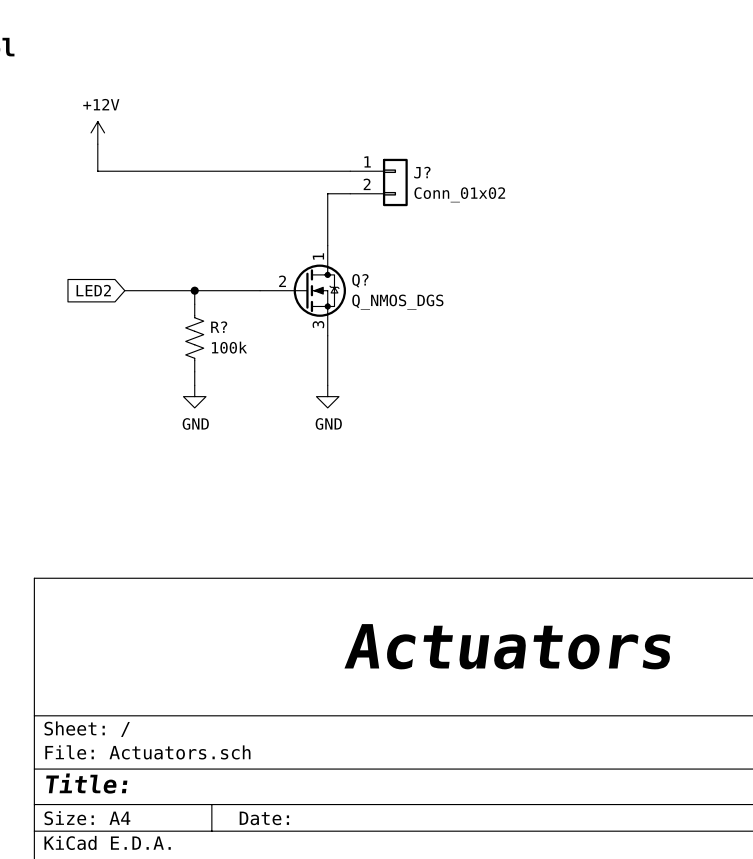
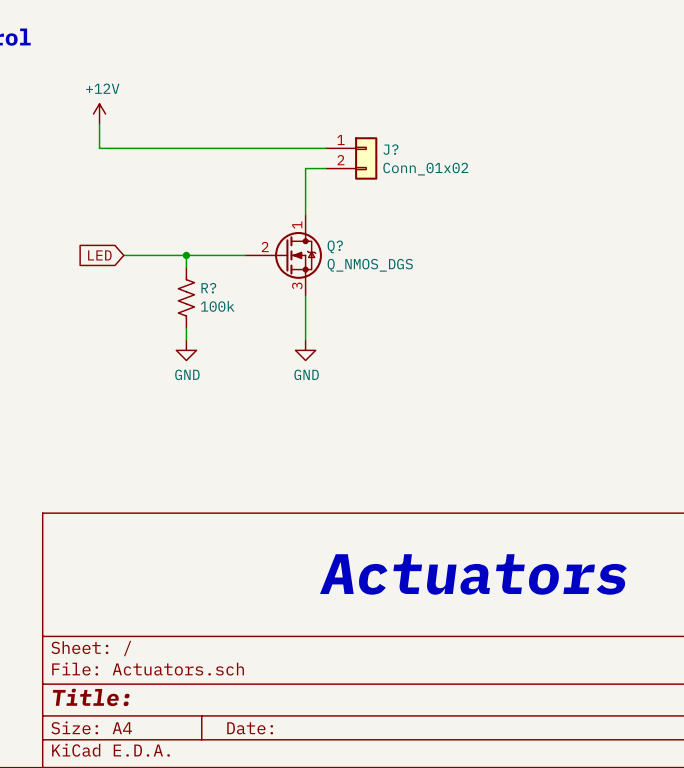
global label: LED2 (93, 290) -> LED (99, 255)

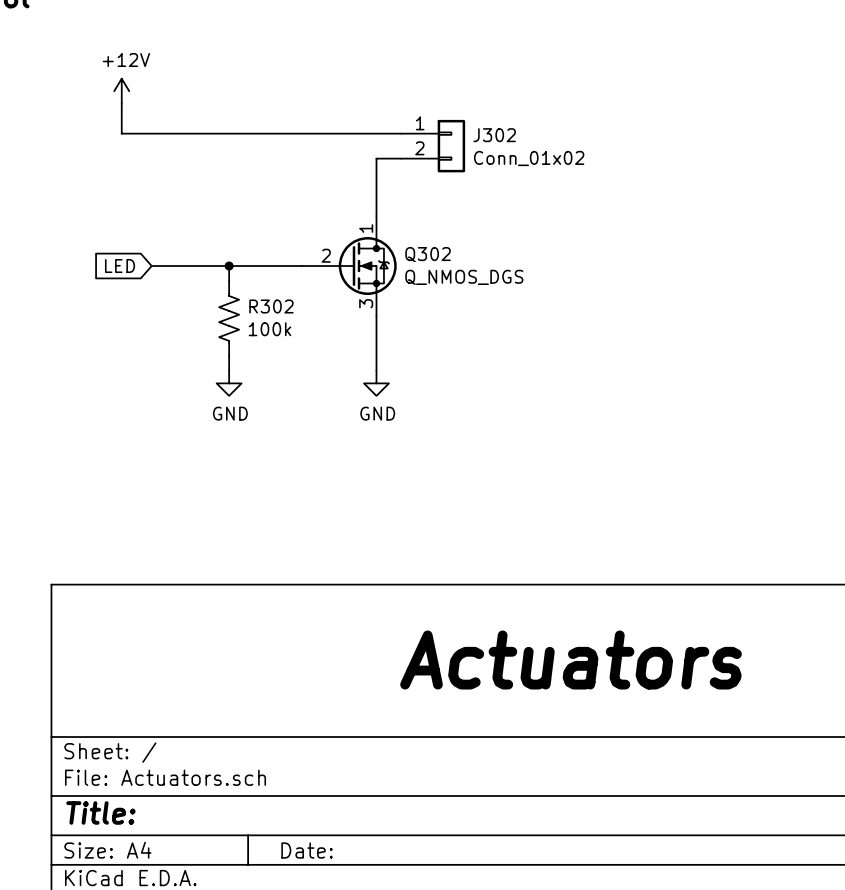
J? name: J? (390, 149) -> J302 (494, 135)
Q? name: Q? (335, 246) -> Q302 (428, 254)
R? name: R? (208, 288) -> R302 (271, 306)

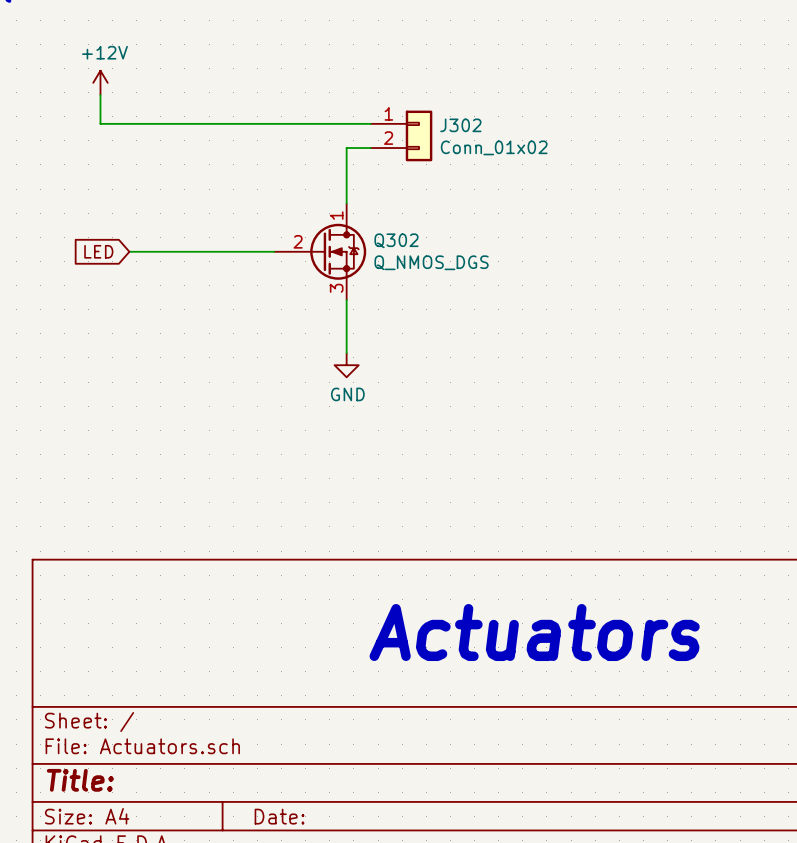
wire: (229, 266) (229, 280) -> none
junction: (229, 266) -> none
R302: 100k (229, 318) -> none
wire: (229, 355) (229, 370) -> none
power symbol: GND (229, 383) -> none

